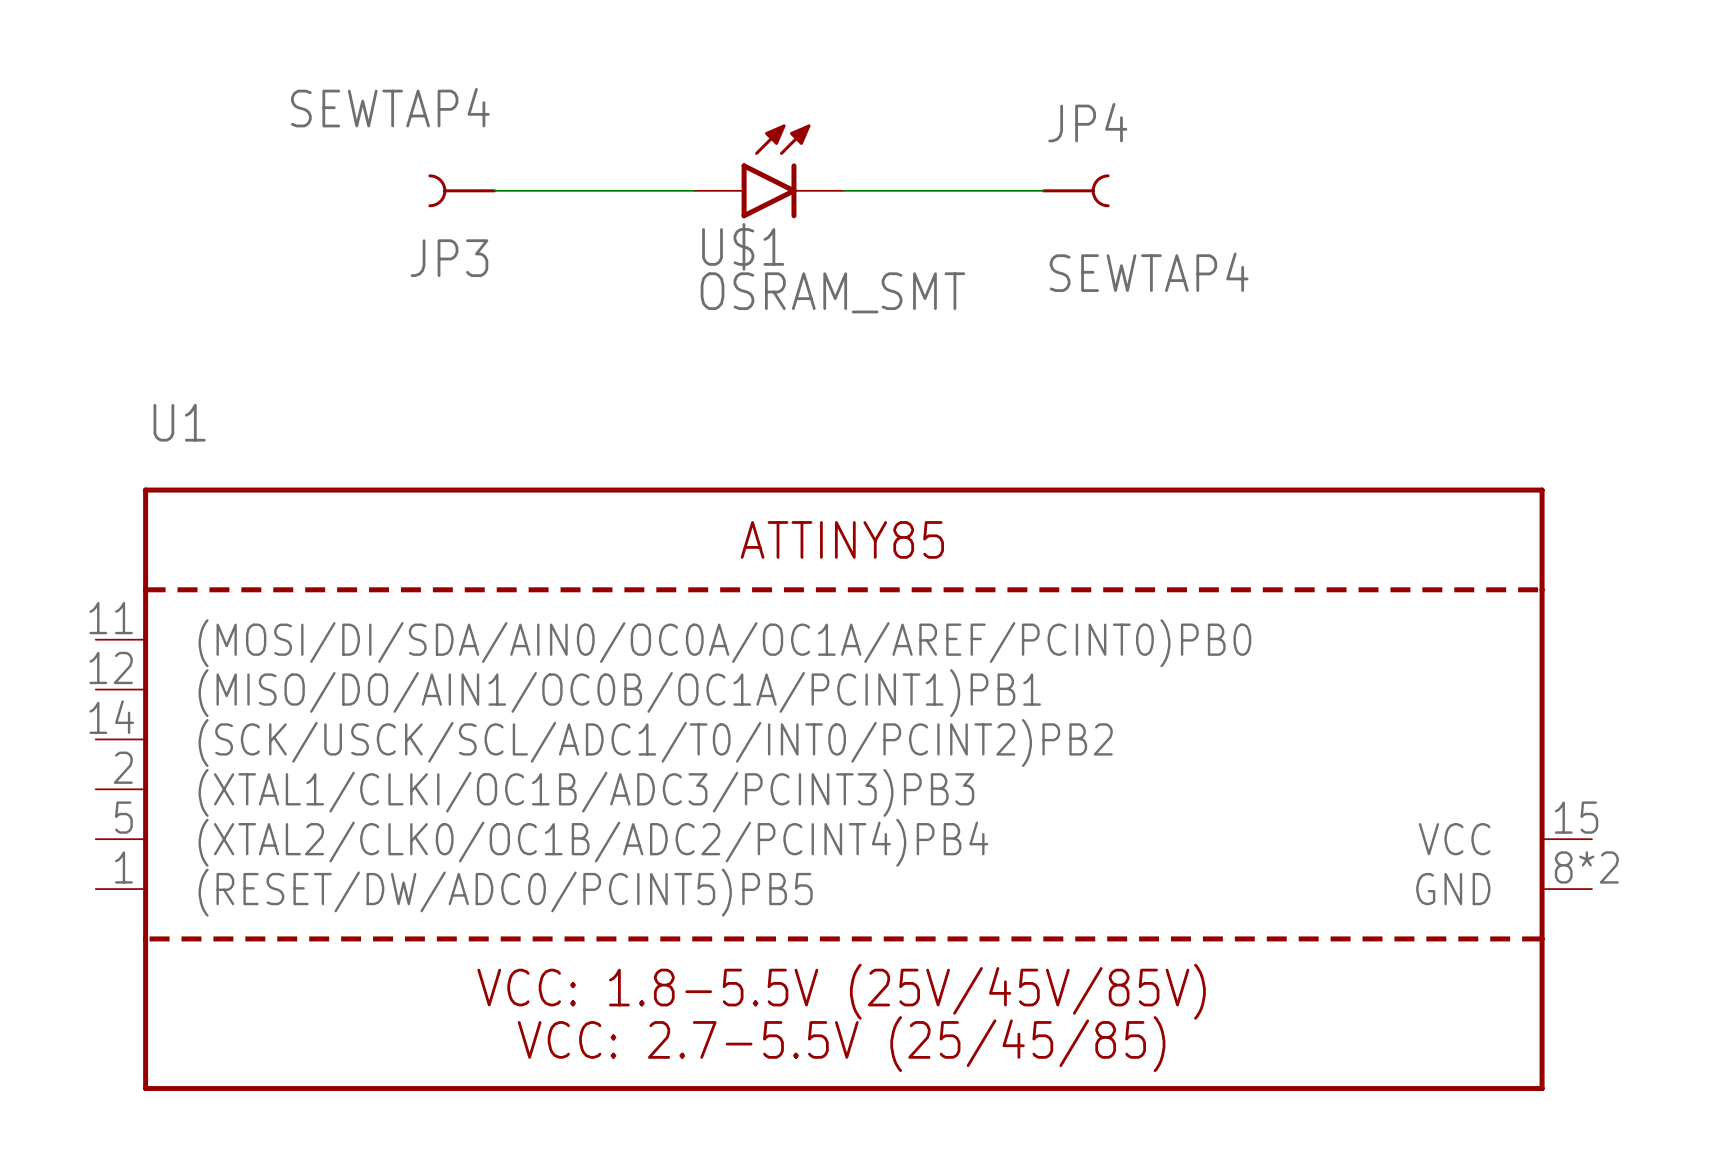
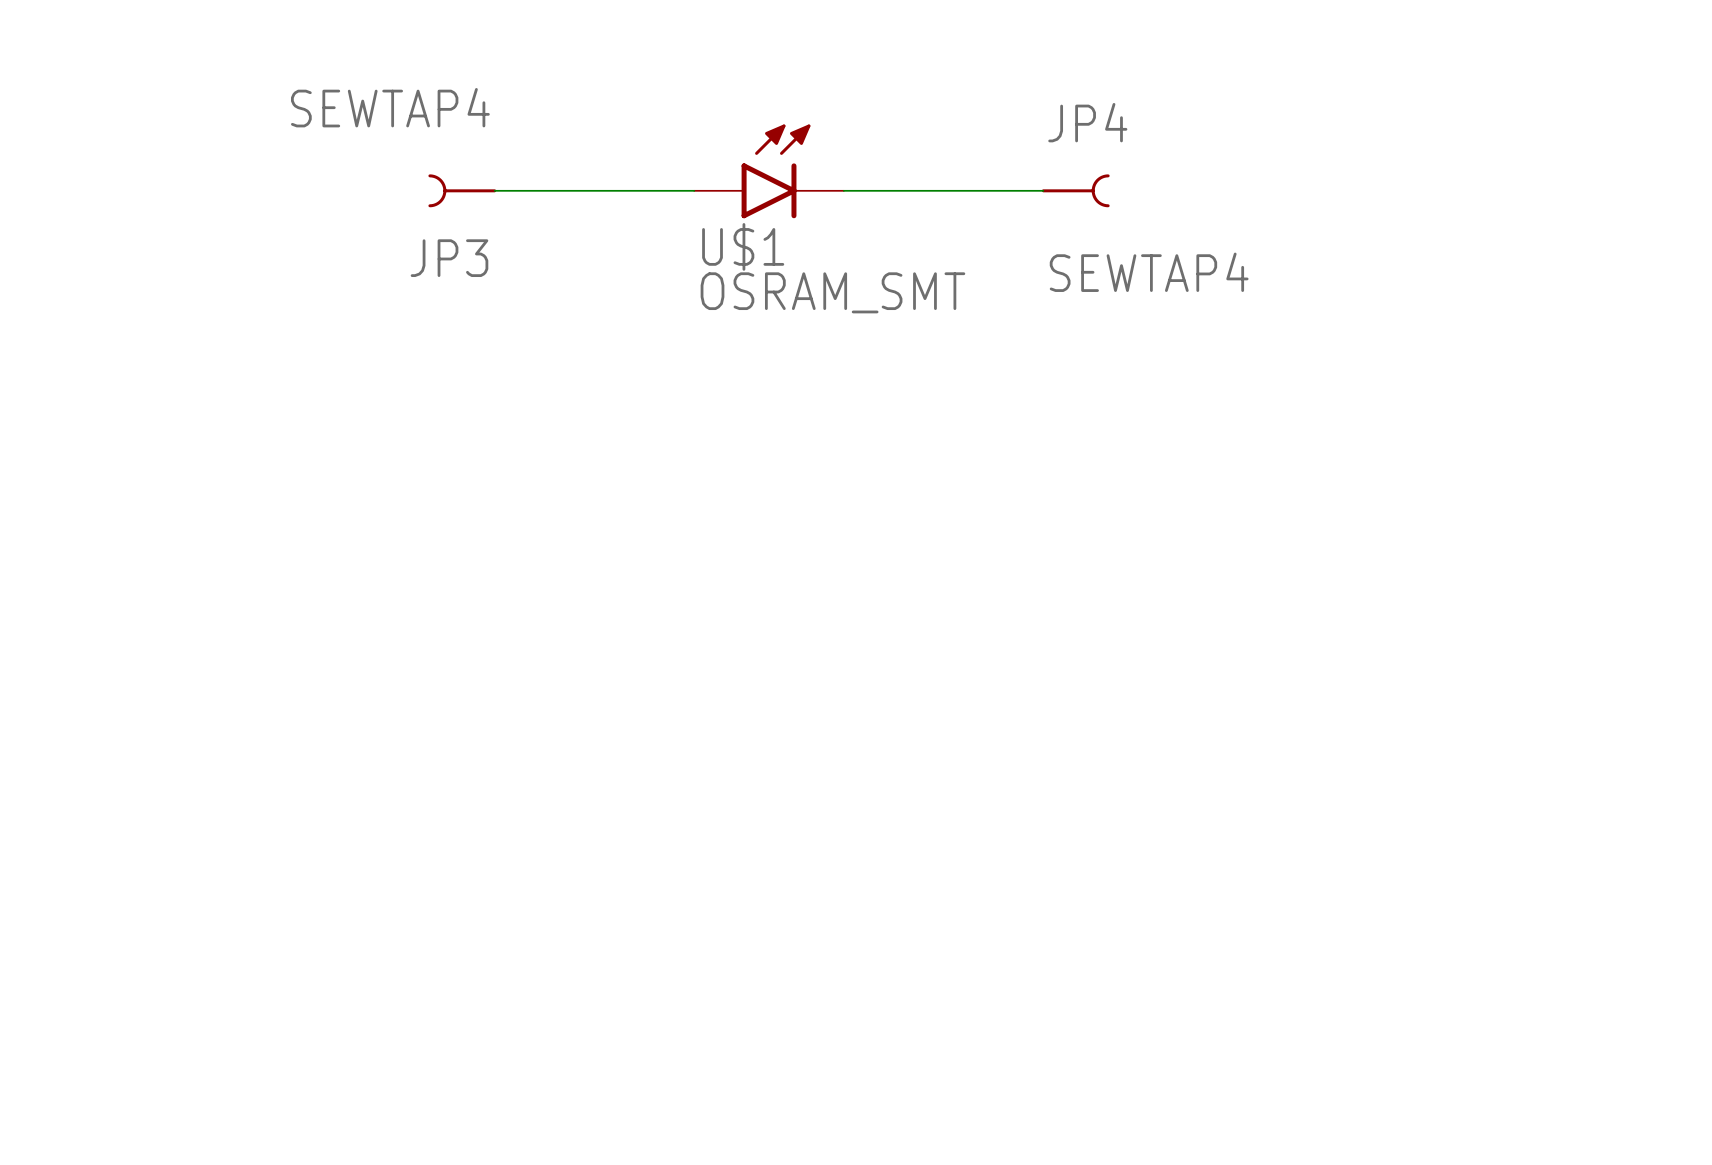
U1: (843, 789) -> none

